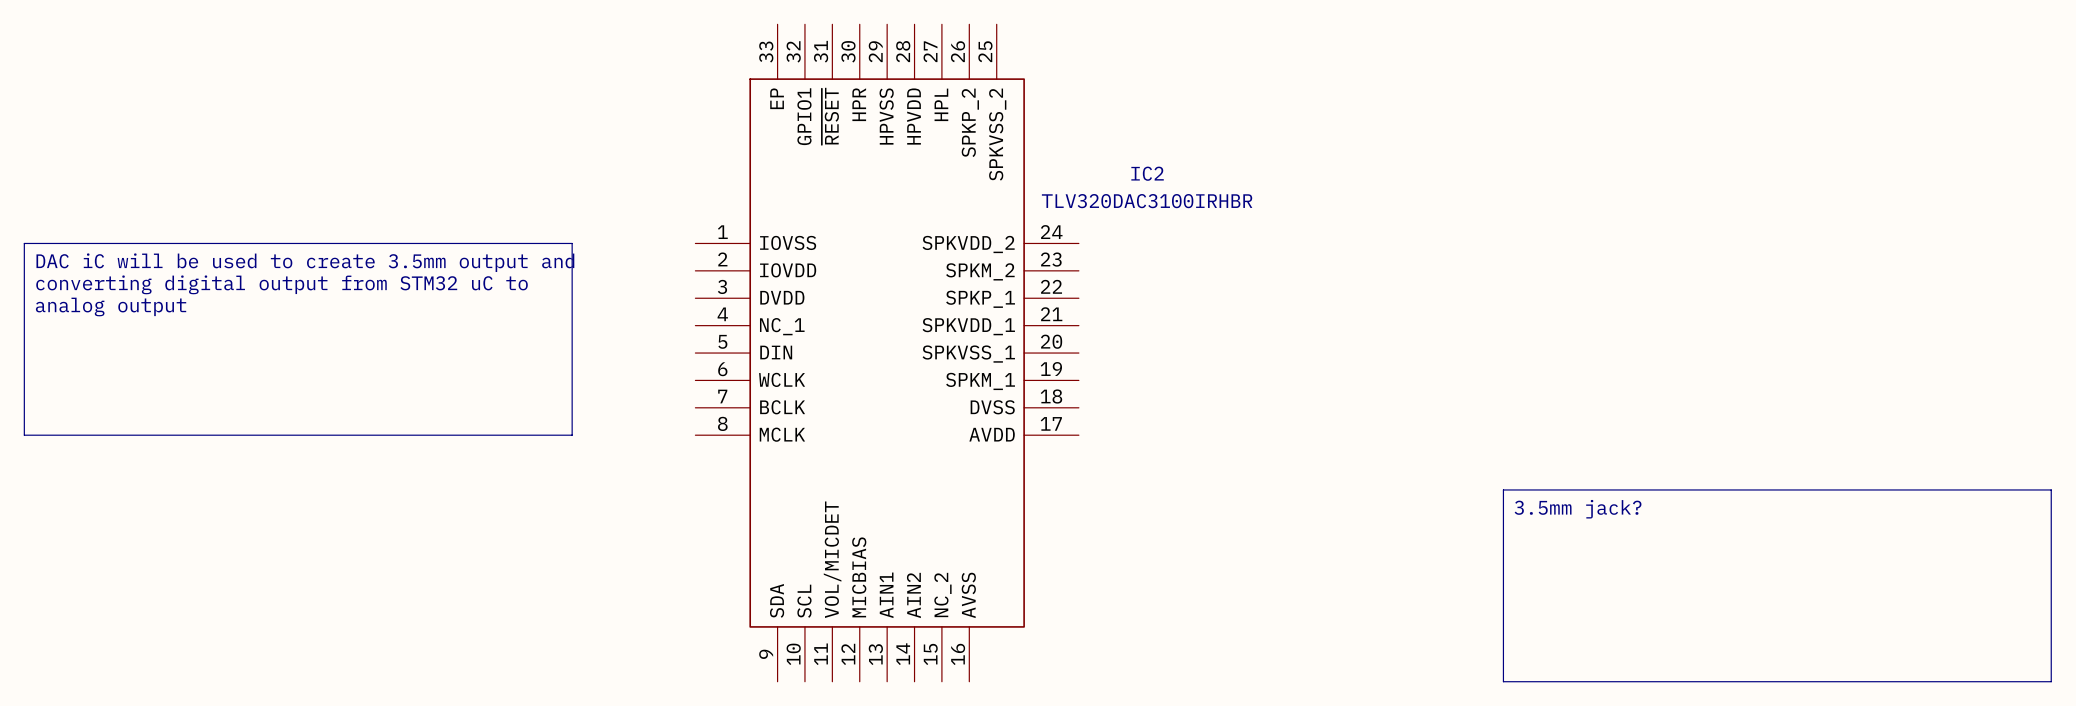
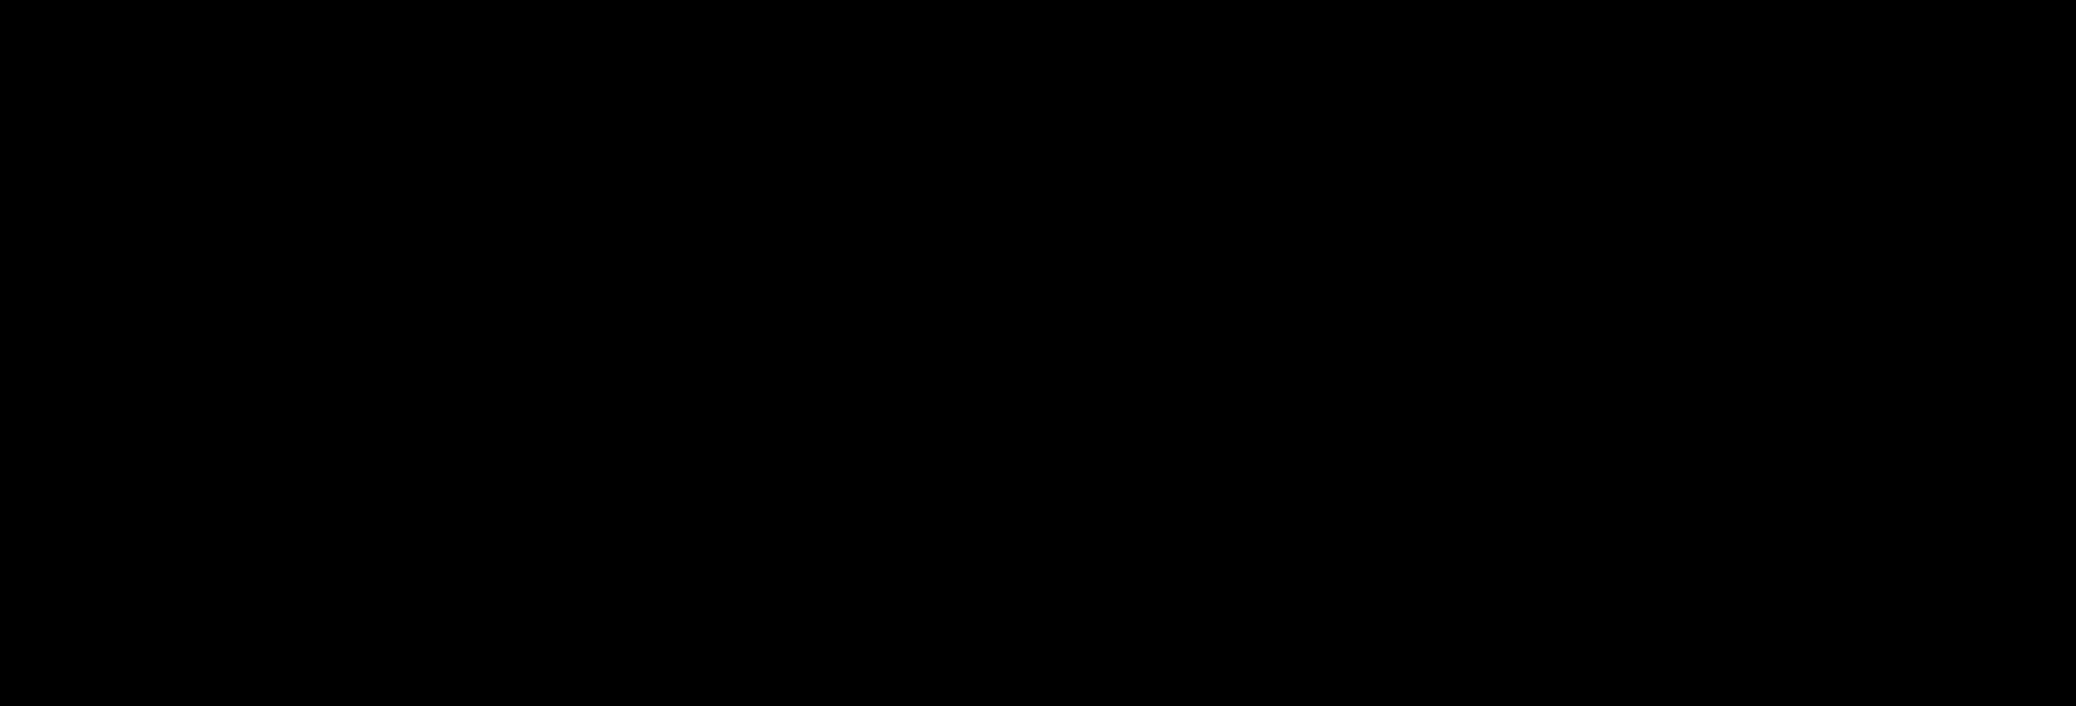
line: (24, 243) (572, 243) (572, 435) (24, 435) (24, 243) -> none
text: DAC iC will be used to create 3.5mm output and (305, 262) -> none
text: converting digital output from STM32 uC to (282, 284) -> none
text: analog output (111, 307) -> none
IC2: TLV320DAC3100IRHBR (887, 353) -> none
line: (1503, 489) (2051, 489) (2051, 681) (1503, 681) (1503, 489) -> none
text: 3.5mm jack? (1578, 509) -> none

